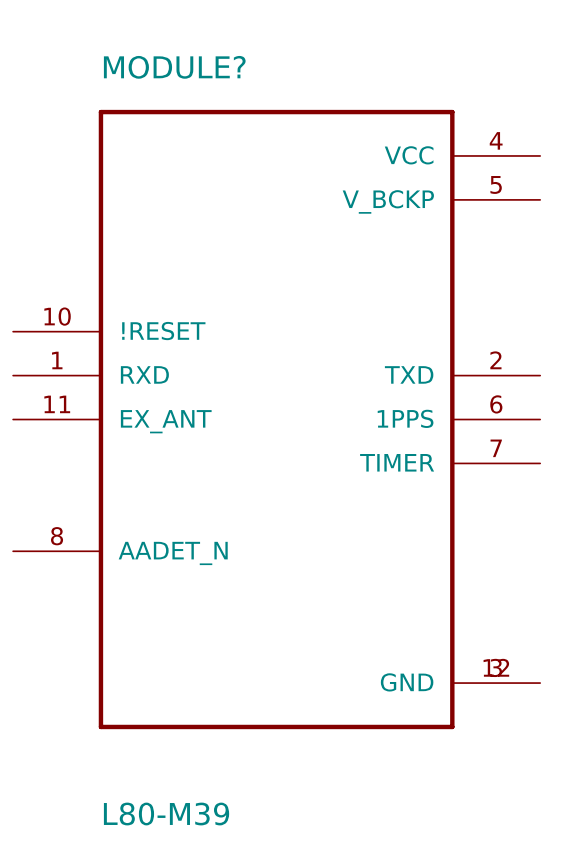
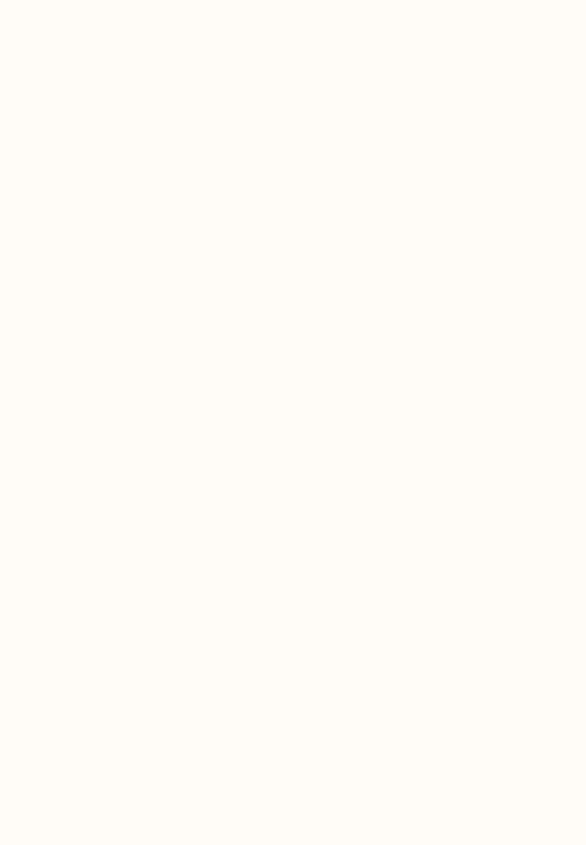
MODULE?: L80-M39 (276, 419) -> none

